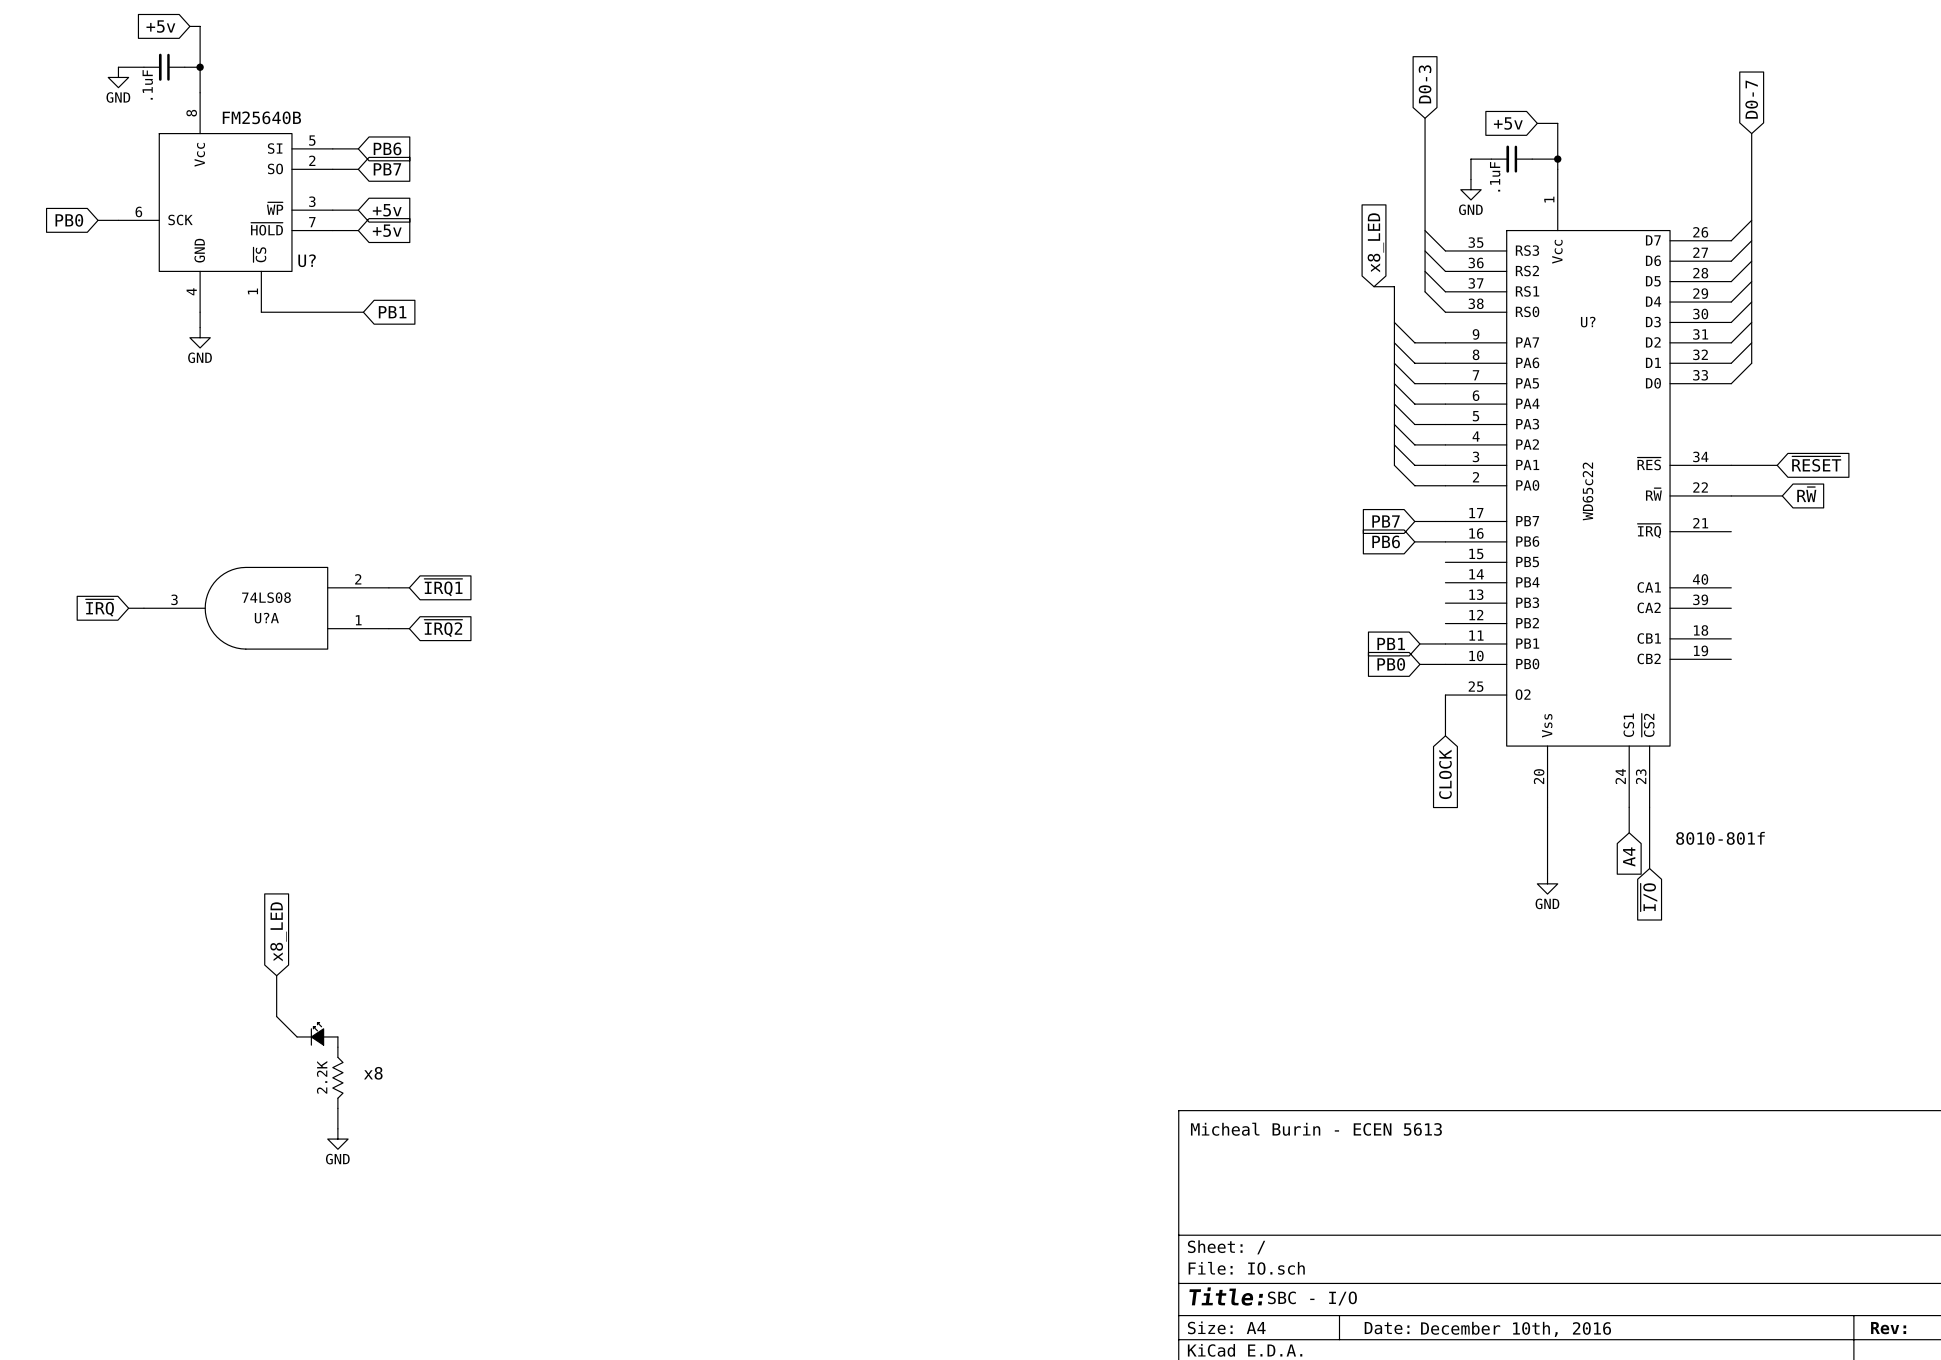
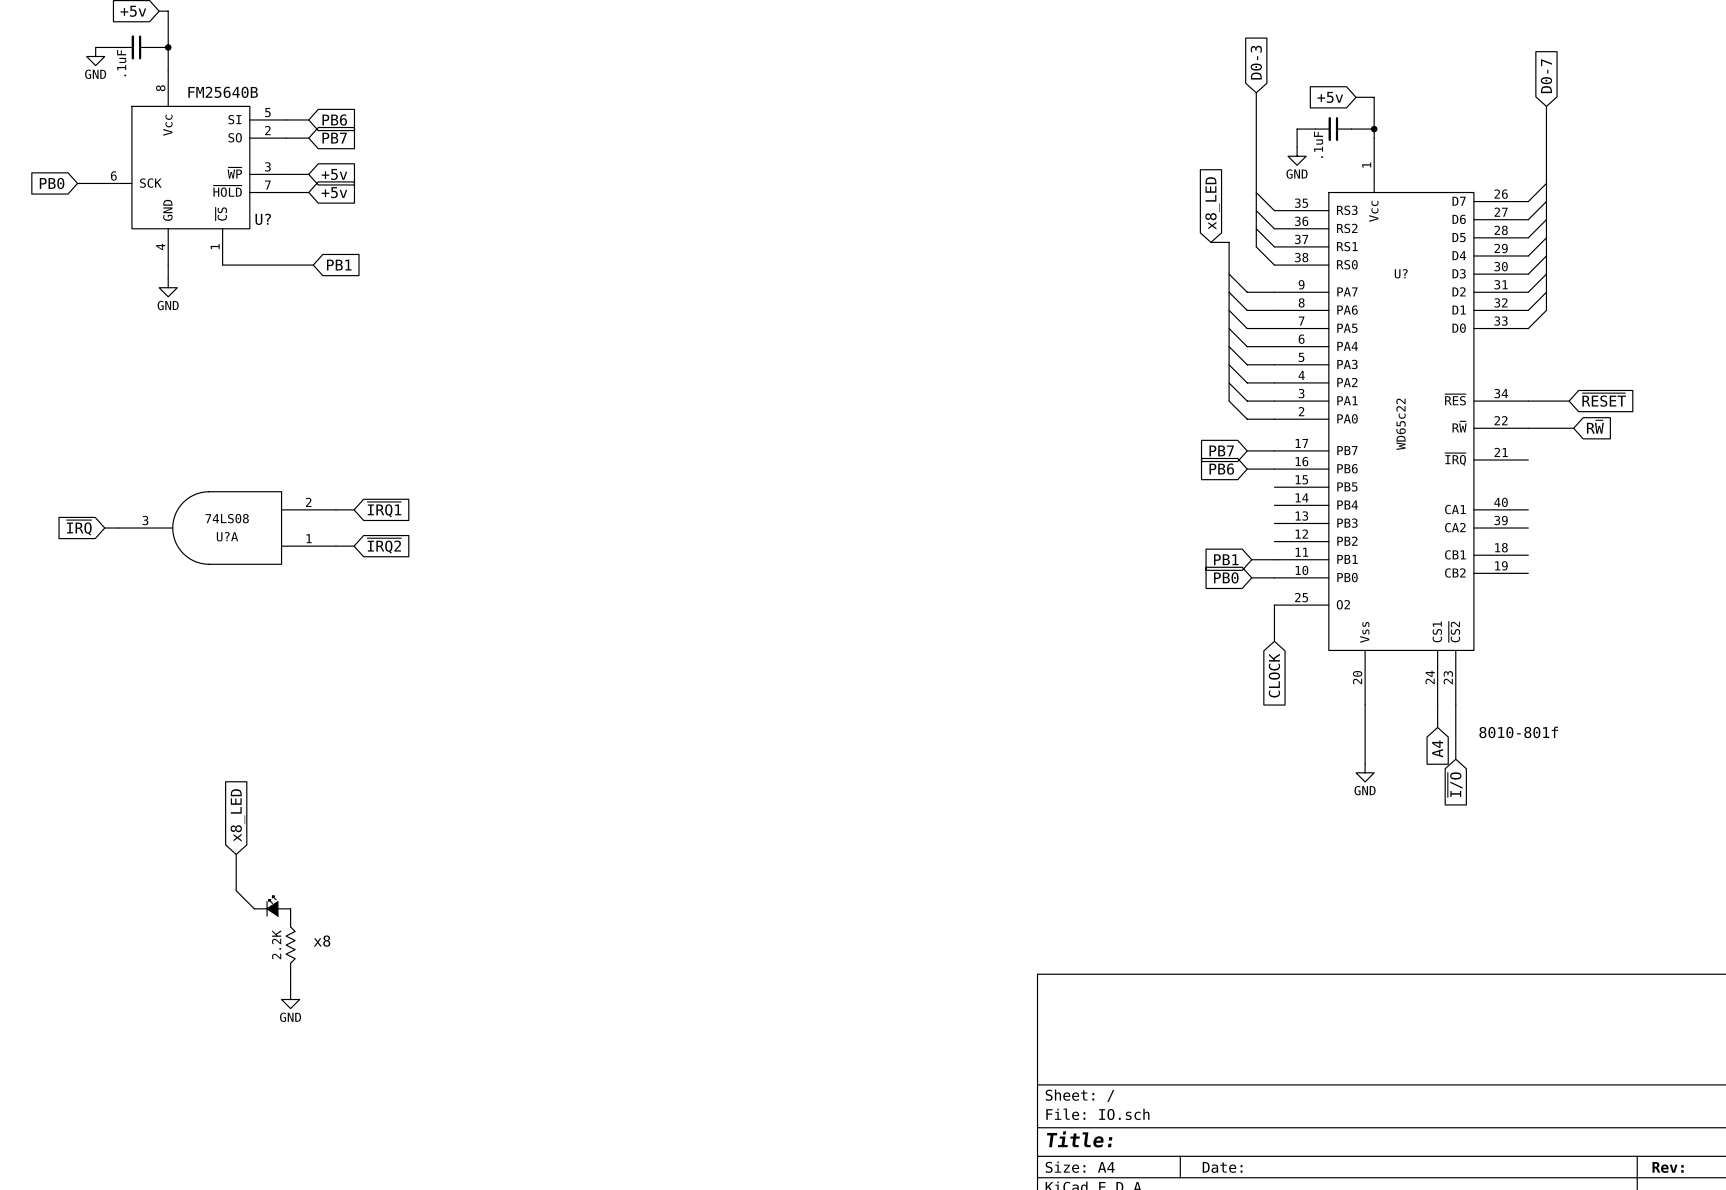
text: Micheal Burin - ECEN 5613 (1316, 1129) -> none
text: SBC - I/O (1312, 1298) -> none
text: December 10th, 2016 (1516, 1329) -> none

